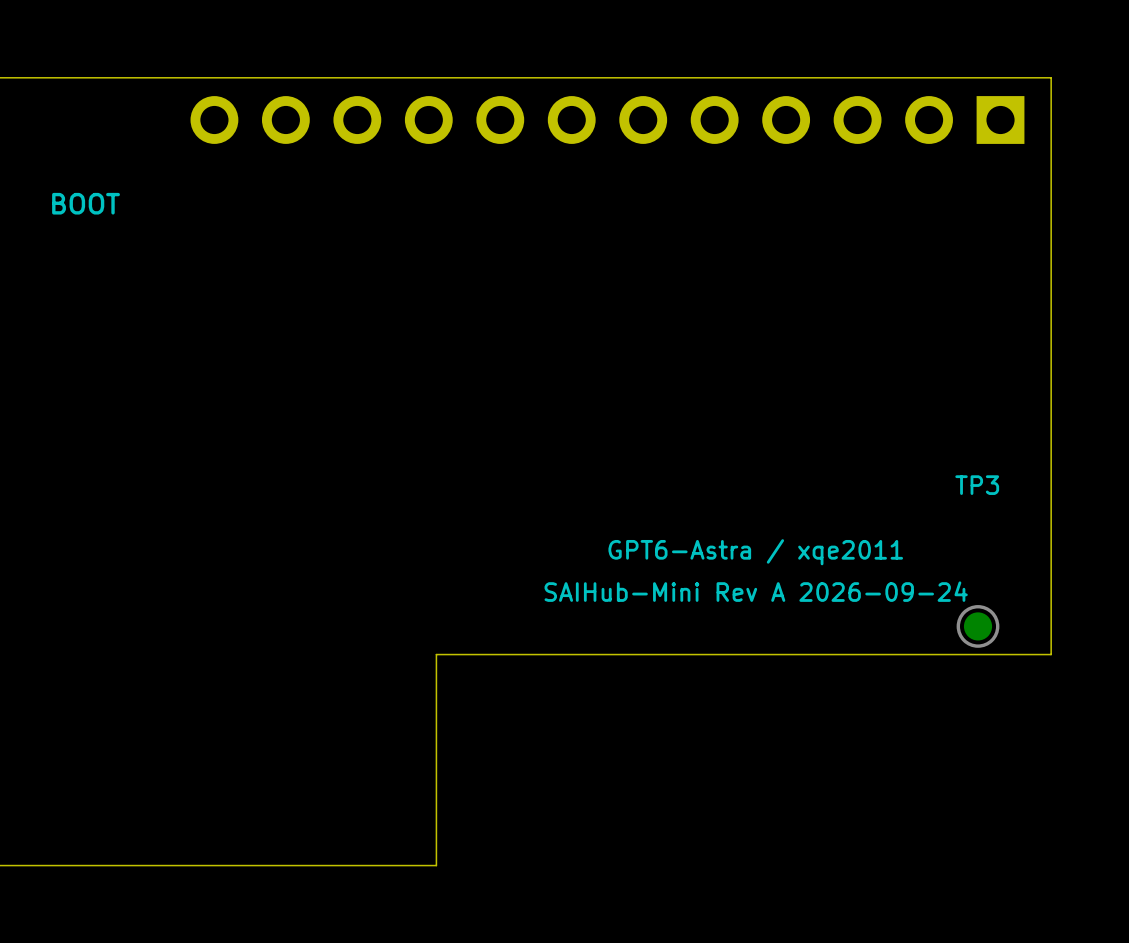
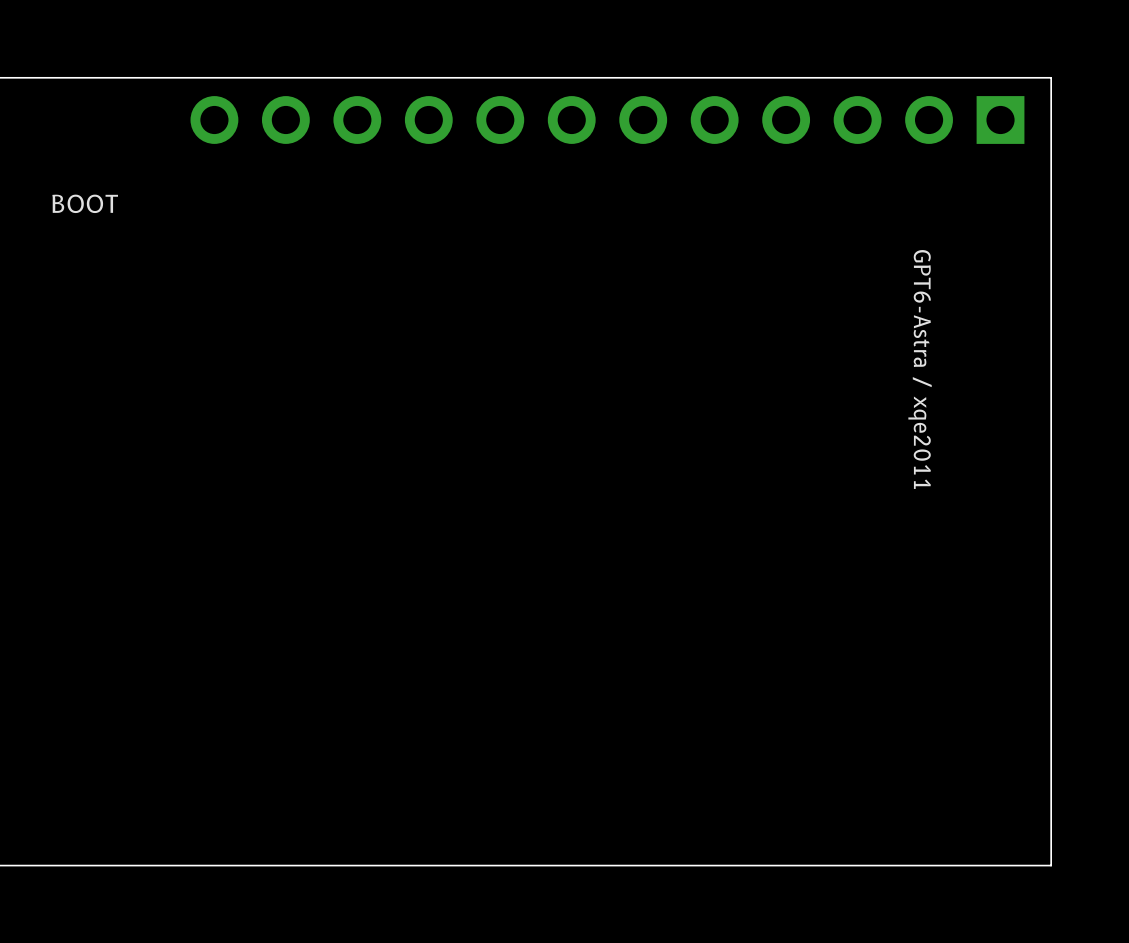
text rotation: 0° (755, 552) -> 90° clockwise (920, 369)
text: SAIHub-Mini Rev A 2026-09-24 (756, 591) -> none
TP3: (978, 626) -> none
board edge: (1051, 654) (436, 654) (436, 865) -> (1051, 654) (1051, 865) (436, 865)

